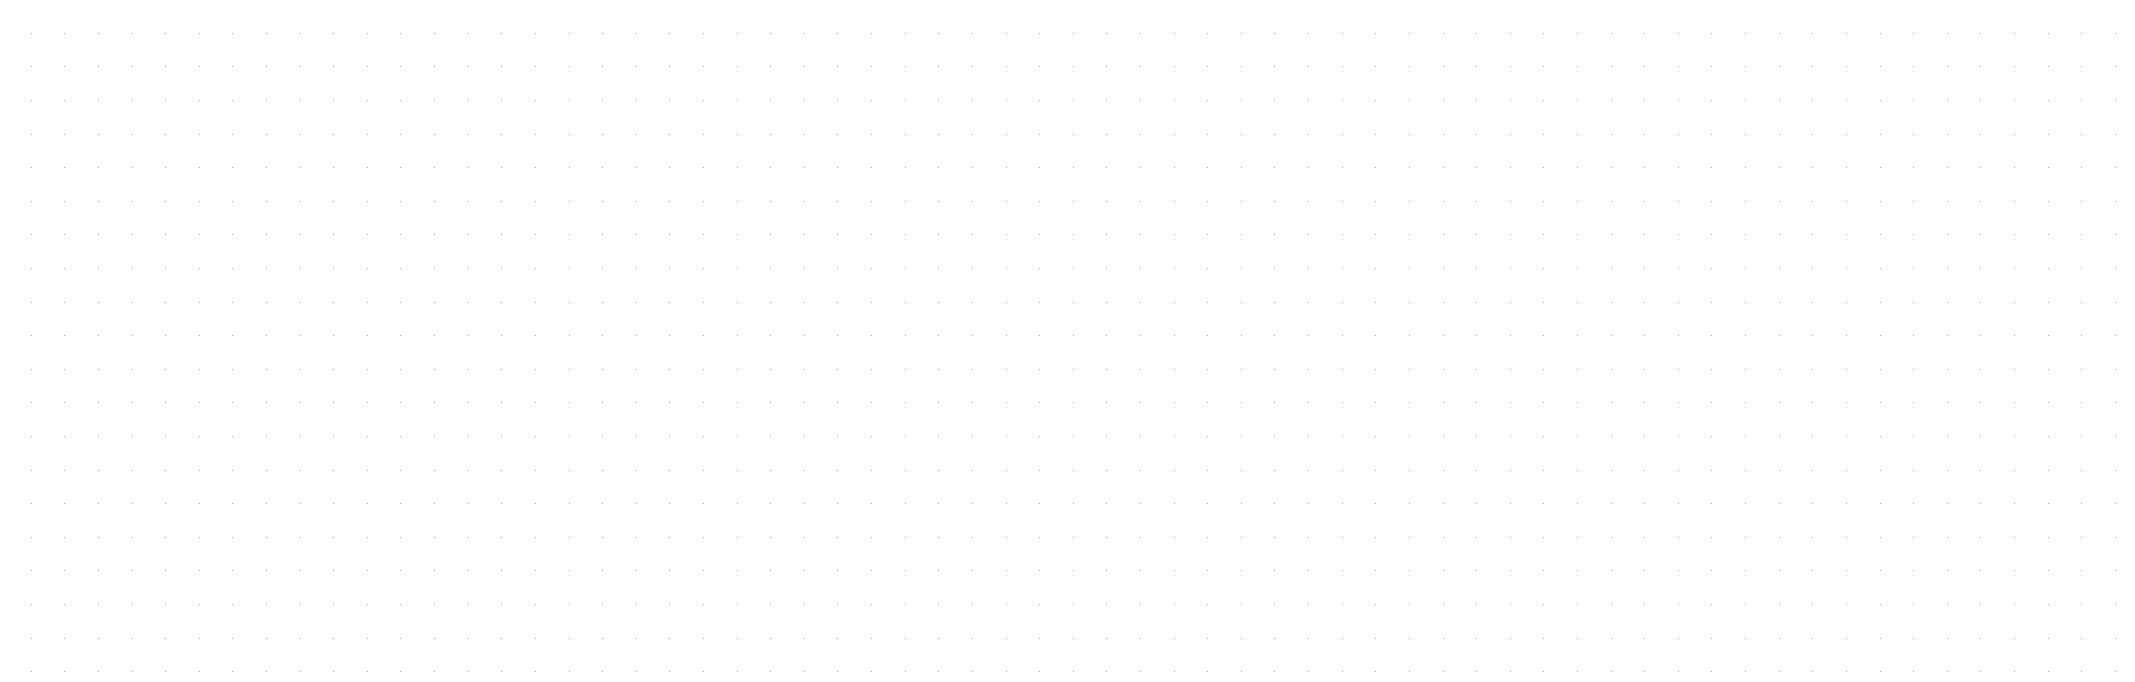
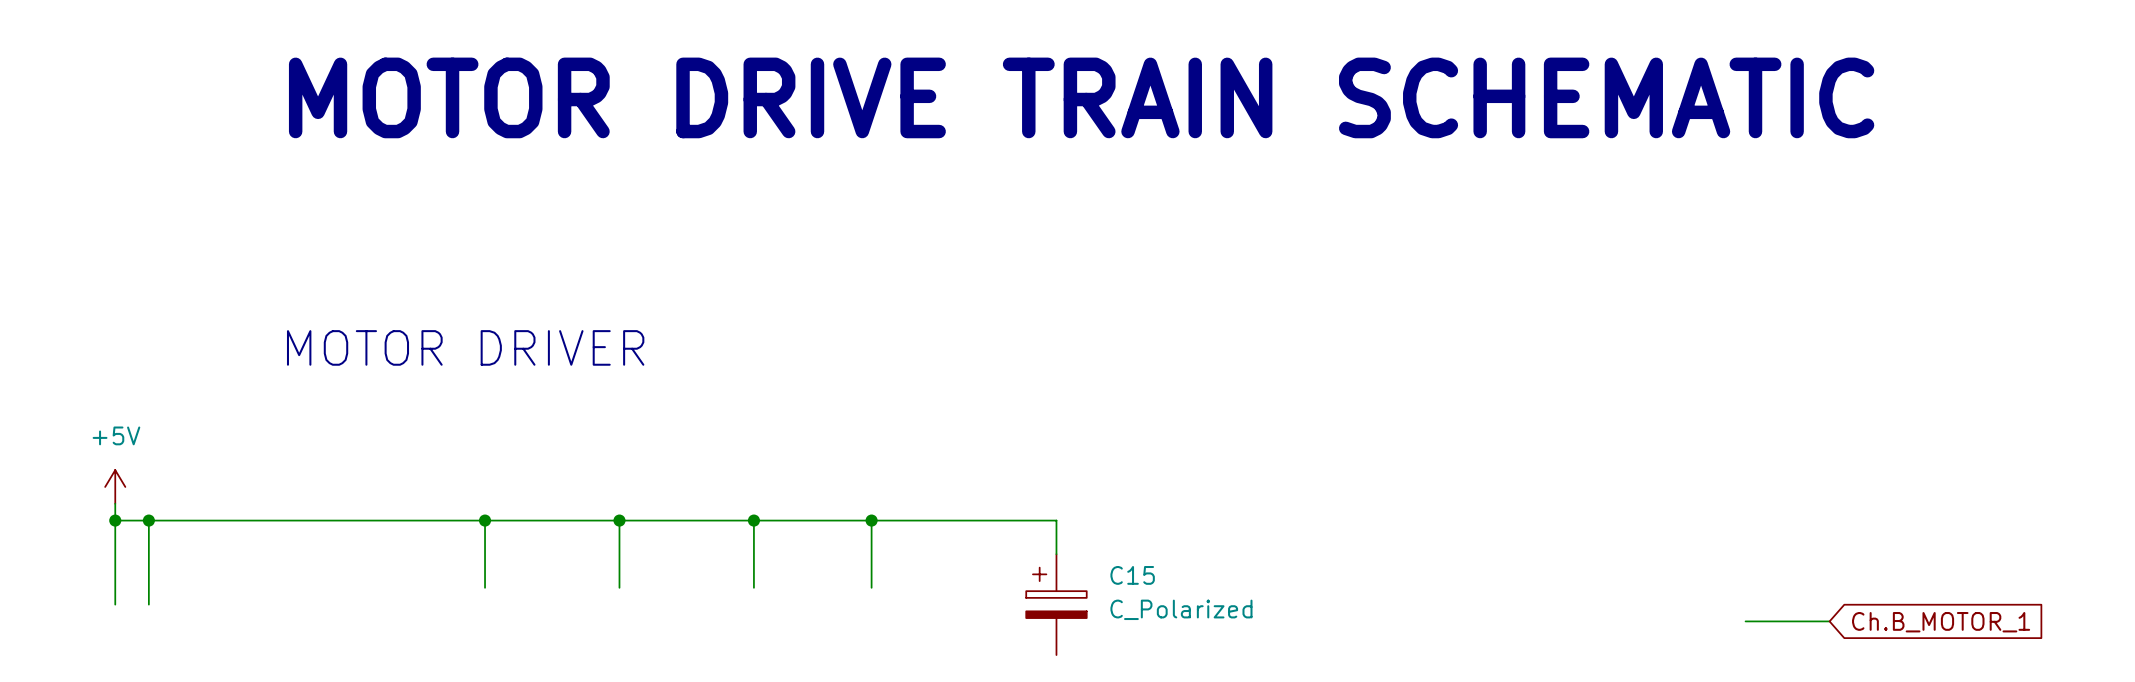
text: none -> MOTOR DRIVE TRAIN SCHEMATIC (1081, 97)
text: none -> MOTOR DRIVER (465, 347)
power symbol: none -> +5V (115, 486)
wire: none -> (115, 503) (115, 604)
wire: none -> (115, 520) (1056, 520) (1056, 554)
junction: none -> (115, 520)
wire: none -> (148, 520) (148, 604)
junction: none -> (148, 520)
wire: none -> (485, 520) (485, 587)
junction: none -> (485, 520)
wire: none -> (619, 520) (619, 587)
junction: none -> (619, 520)
wire: none -> (753, 520) (753, 587)
junction: none -> (753, 520)
wire: none -> (871, 520) (871, 587)
junction: none -> (871, 520)
C15: none -> C_Polarized (1056, 604)
wire: none -> (1745, 621) (1829, 621)
global label: none -> Ch.B_MOTOR_1 (1941, 622)

